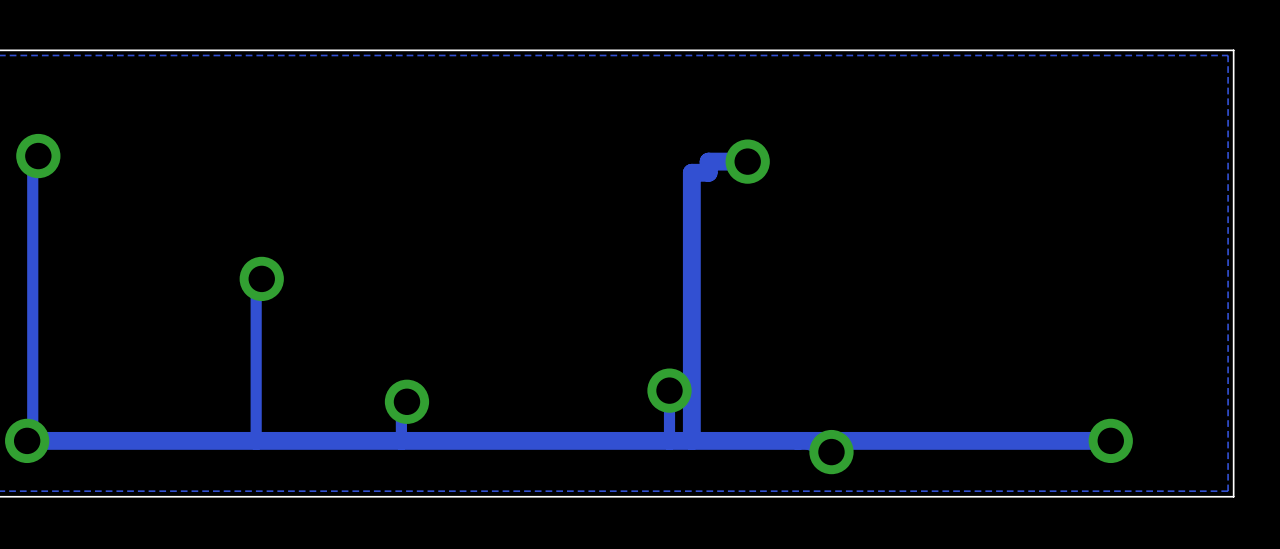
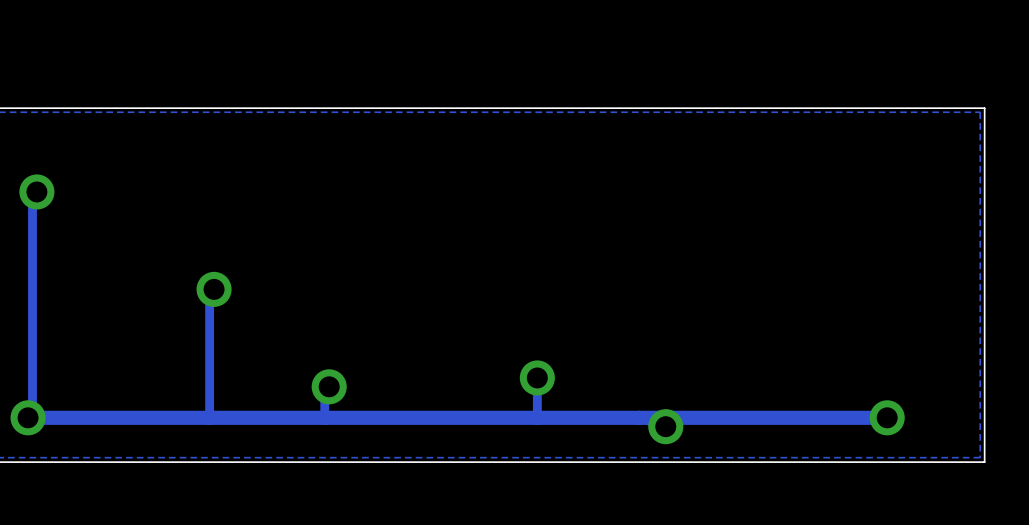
track: (747, 161) (708, 161) (708, 172) (691, 172) (691, 440) -> none
via: (747, 161) -> none

